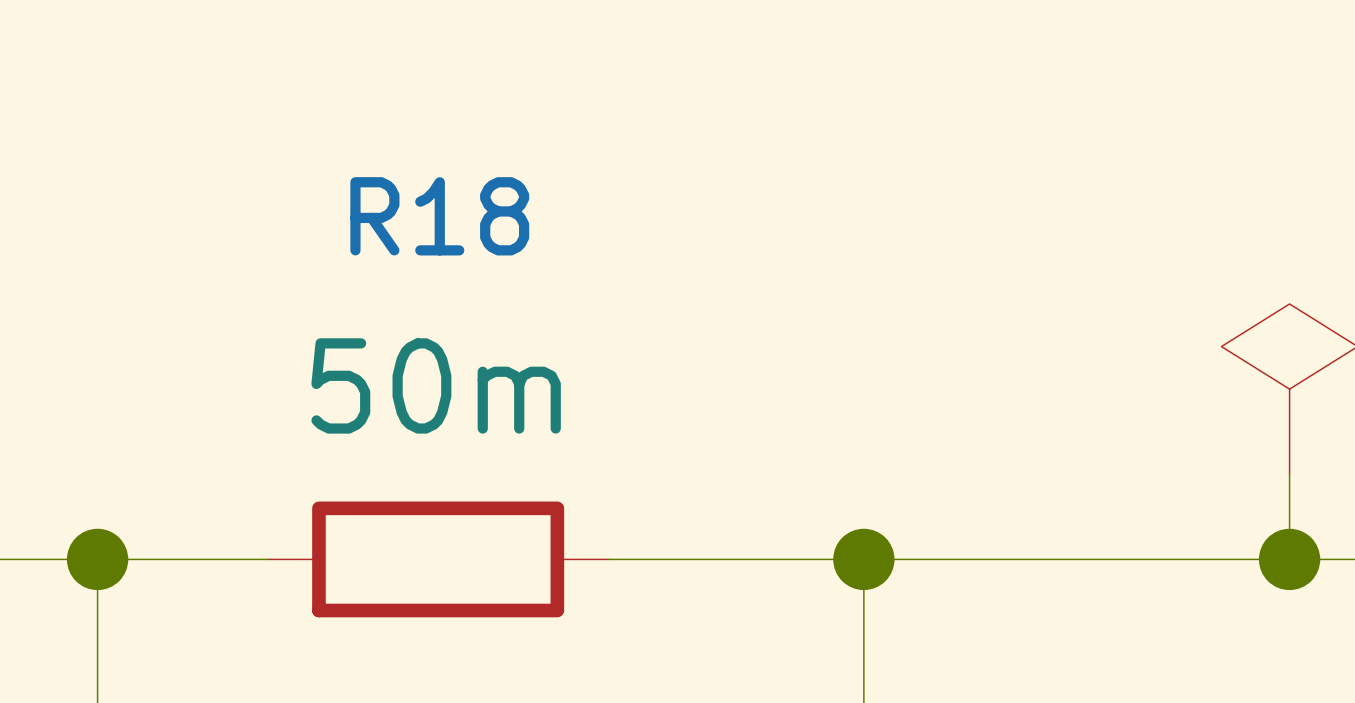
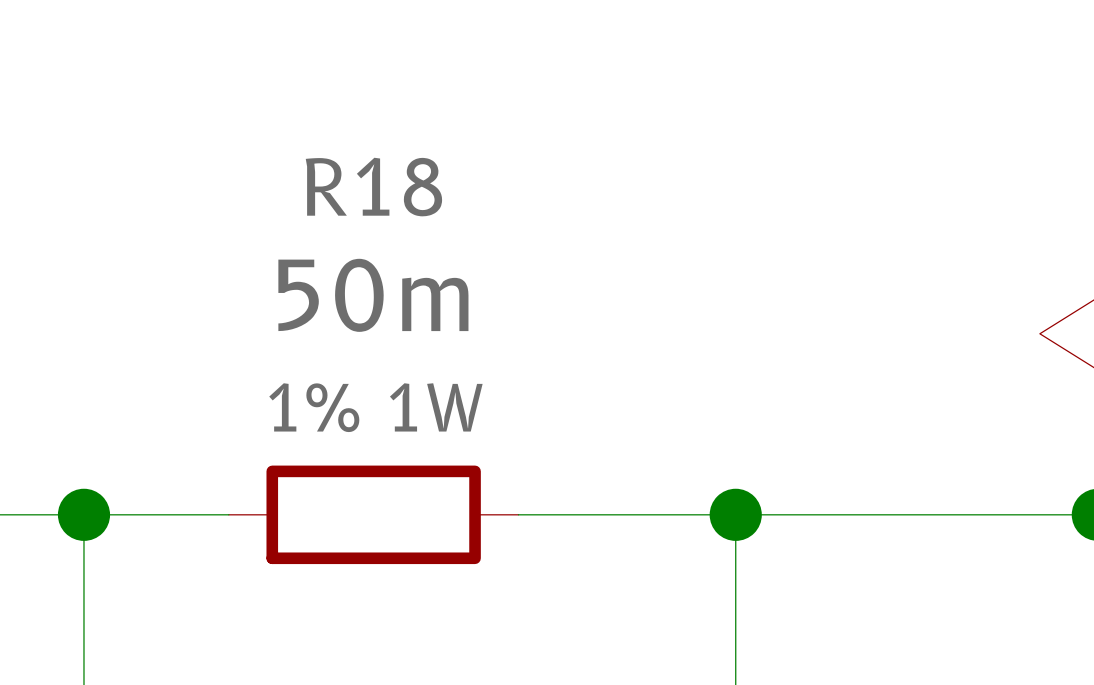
R18 name position: R18 (439, 216) -> R18 (373, 187)
R18 value position: 50m (436, 385) -> 50m (373, 295)
R18 text: none -> 1% 1W (375, 407)

